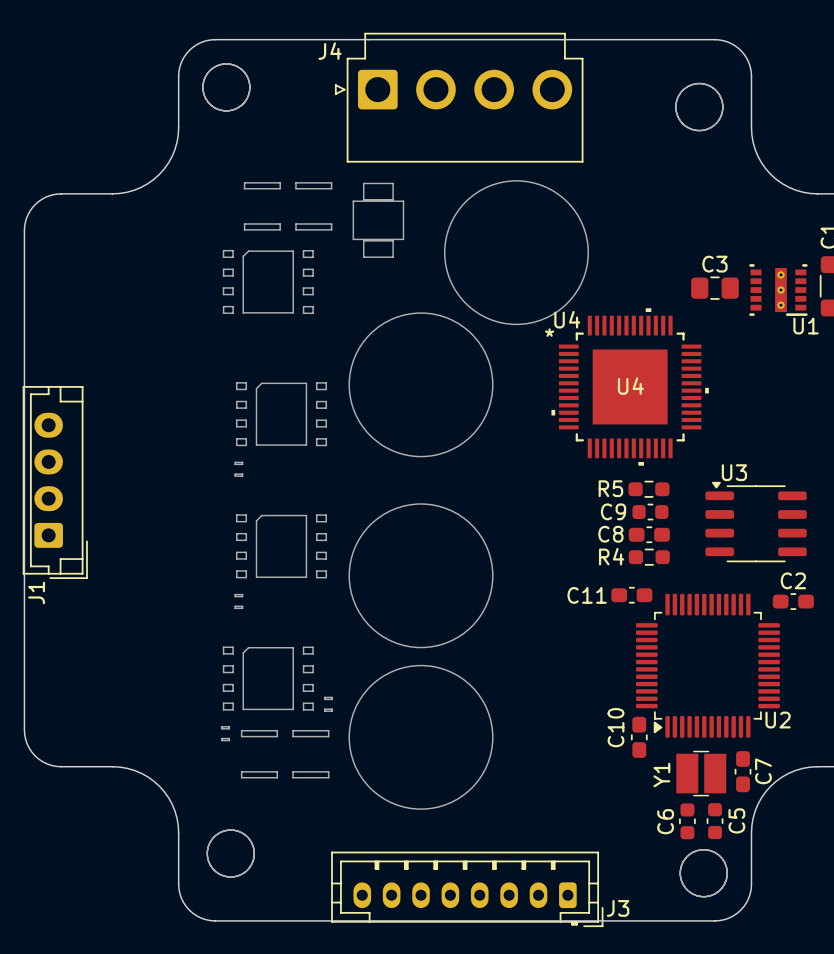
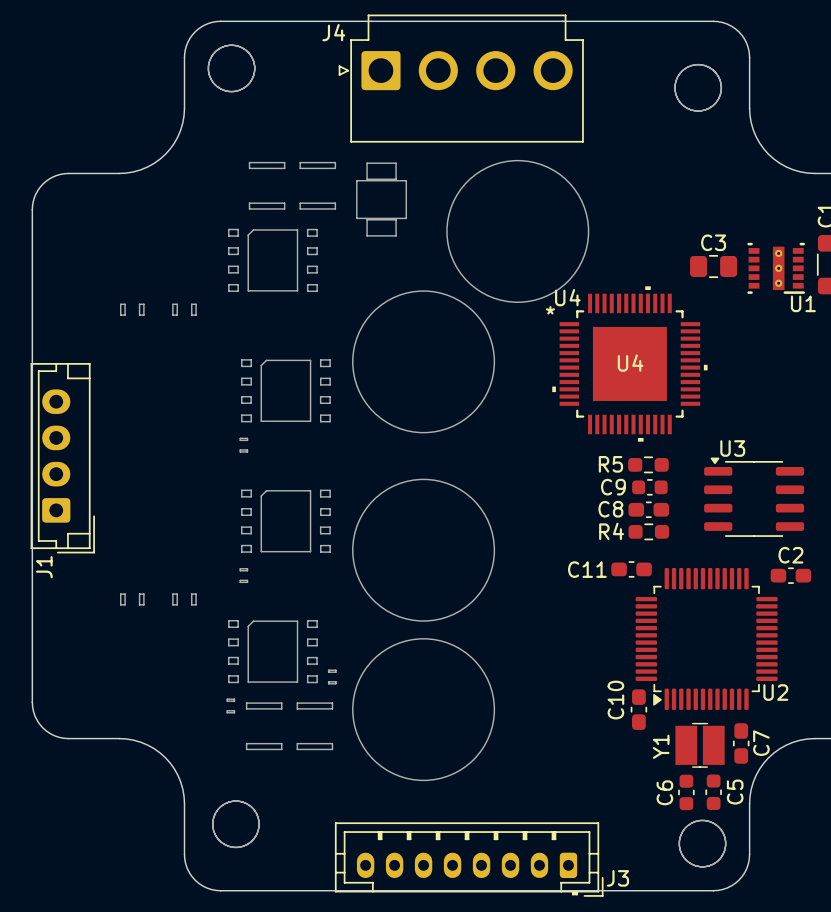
line: none -> (120, 304) (120, 315) (125, 315) (125, 304) (120, 304)
line: none -> (139, 304) (143, 304) (143, 315) (139, 315) (139, 304)
line: none -> (172, 304) (172, 315) (177, 315) (177, 304) (172, 304)
line: none -> (191, 304) (191, 315) (196, 315) (196, 304) (191, 304)
line: none -> (120, 594) (125, 594) (125, 604) (120, 604) (120, 594)
line: none -> (139, 594) (143, 594) (143, 604) (139, 604) (139, 594)
line: none -> (172, 594) (177, 594) (177, 604) (172, 604) (172, 594)
line: none -> (191, 594) (196, 594) (196, 604) (191, 604) (191, 594)

